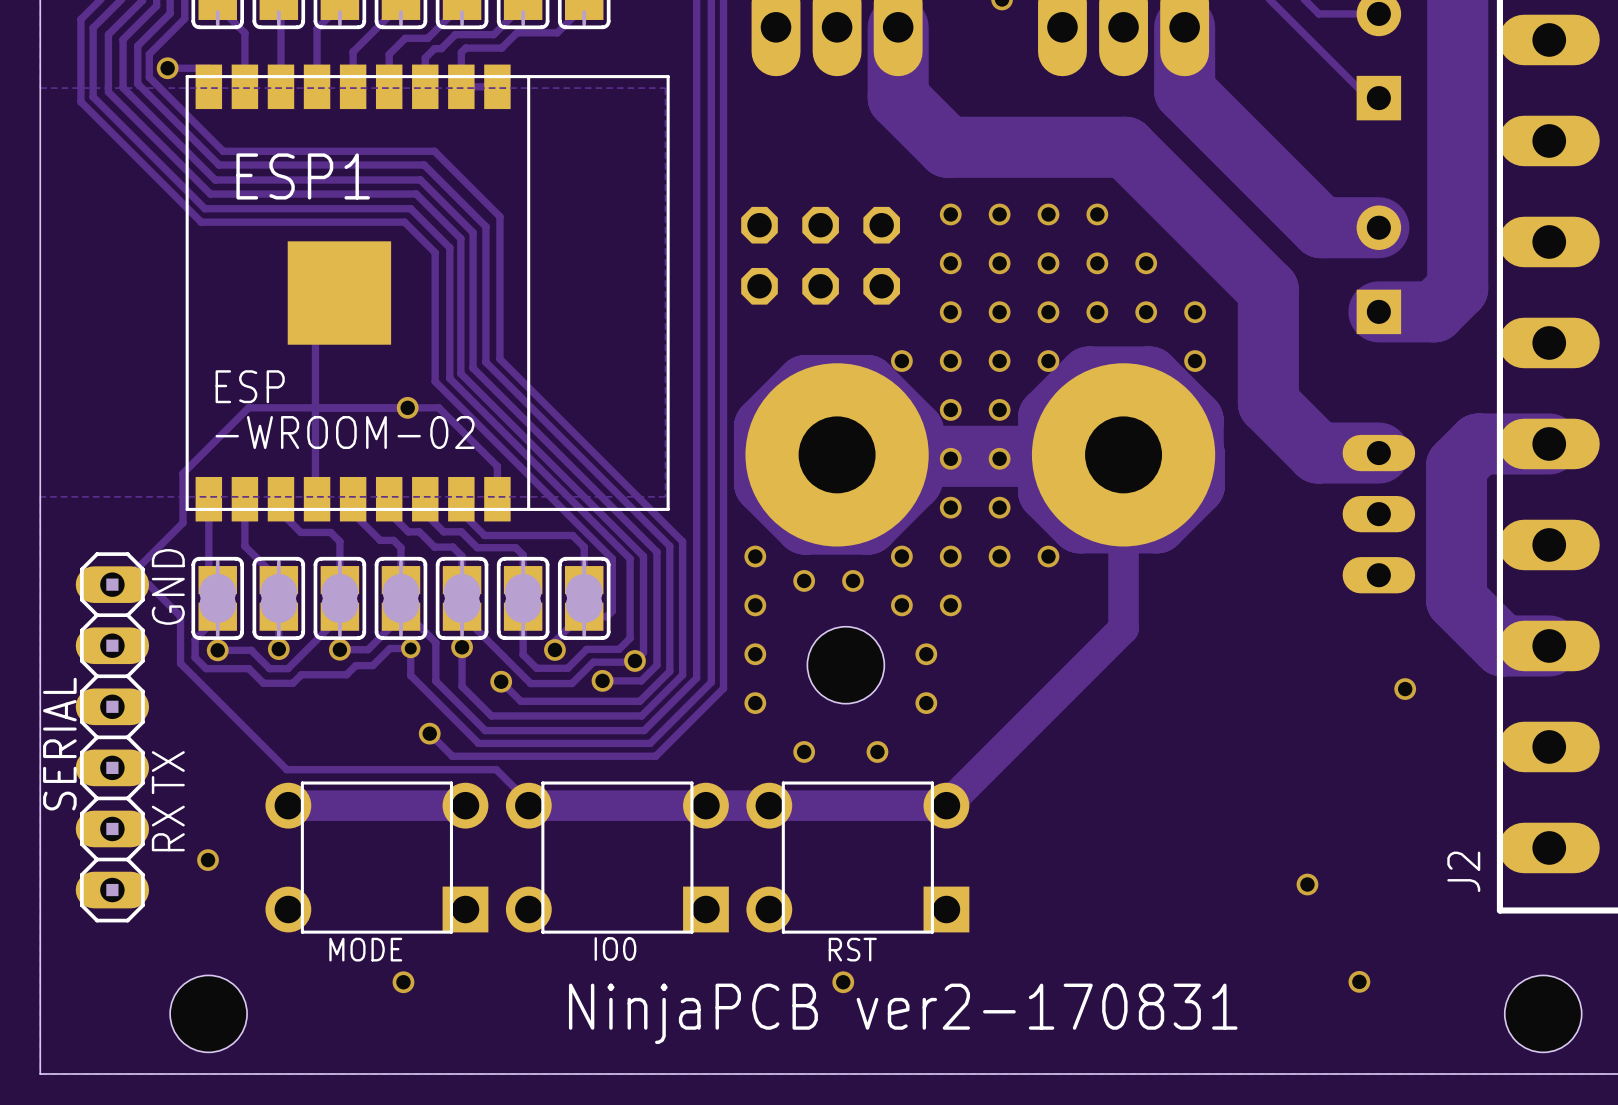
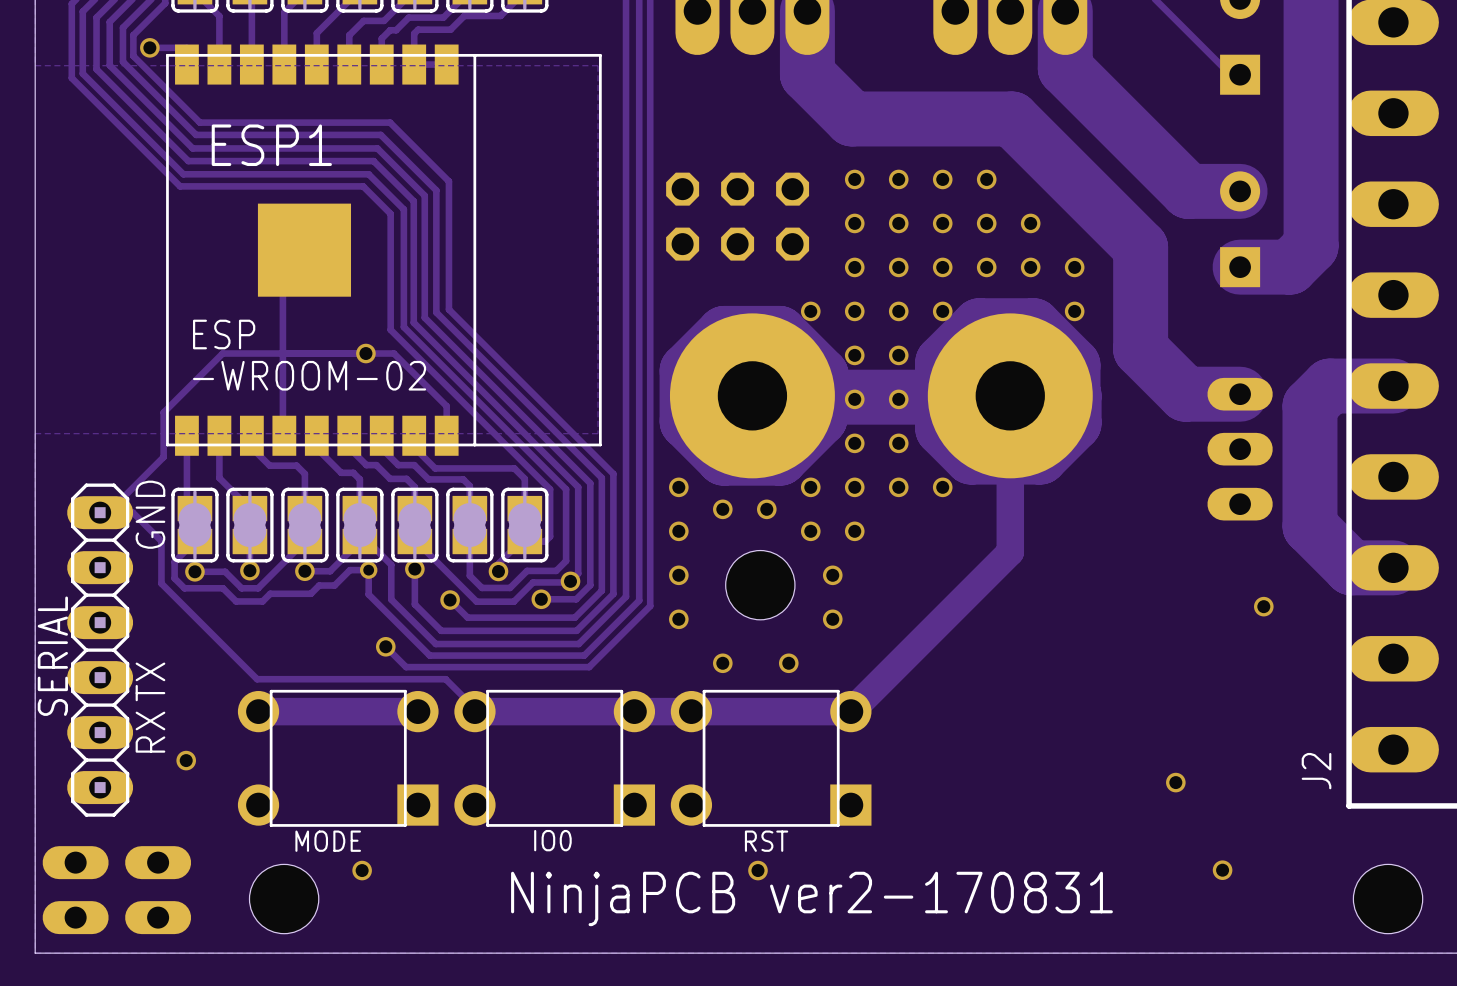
part: none -> (75, 890)
part: none -> (158, 890)
hole position: (208, 1013) -> (284, 899)

